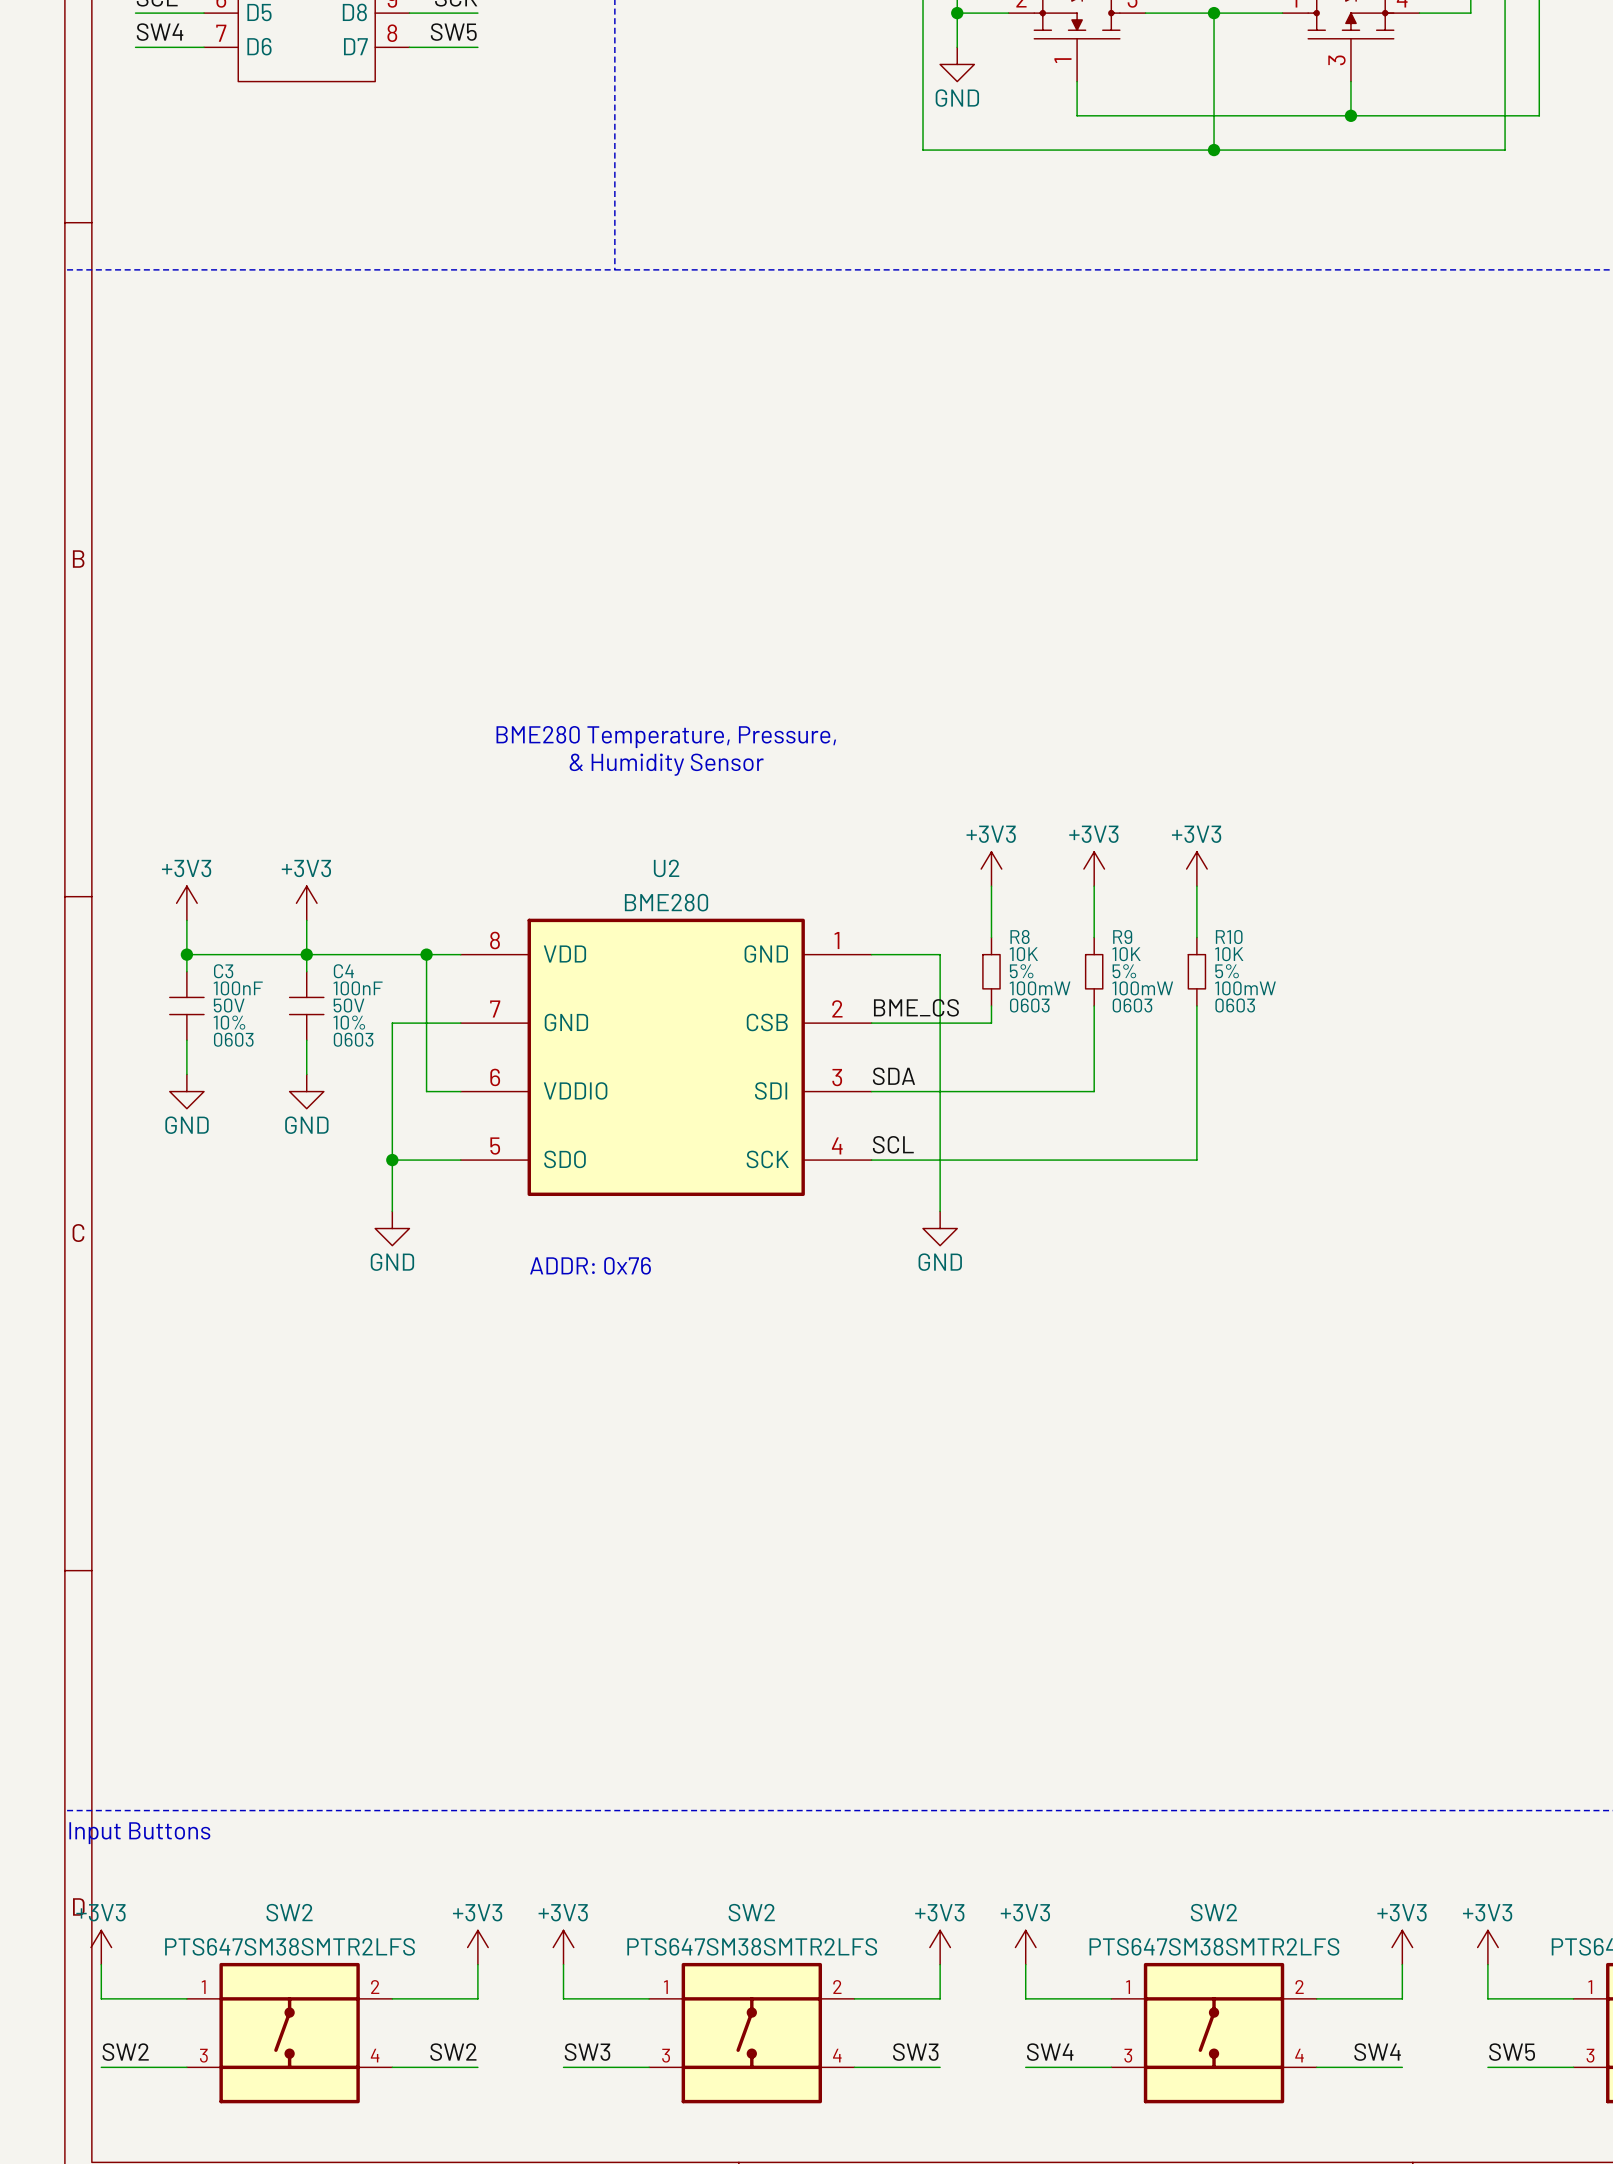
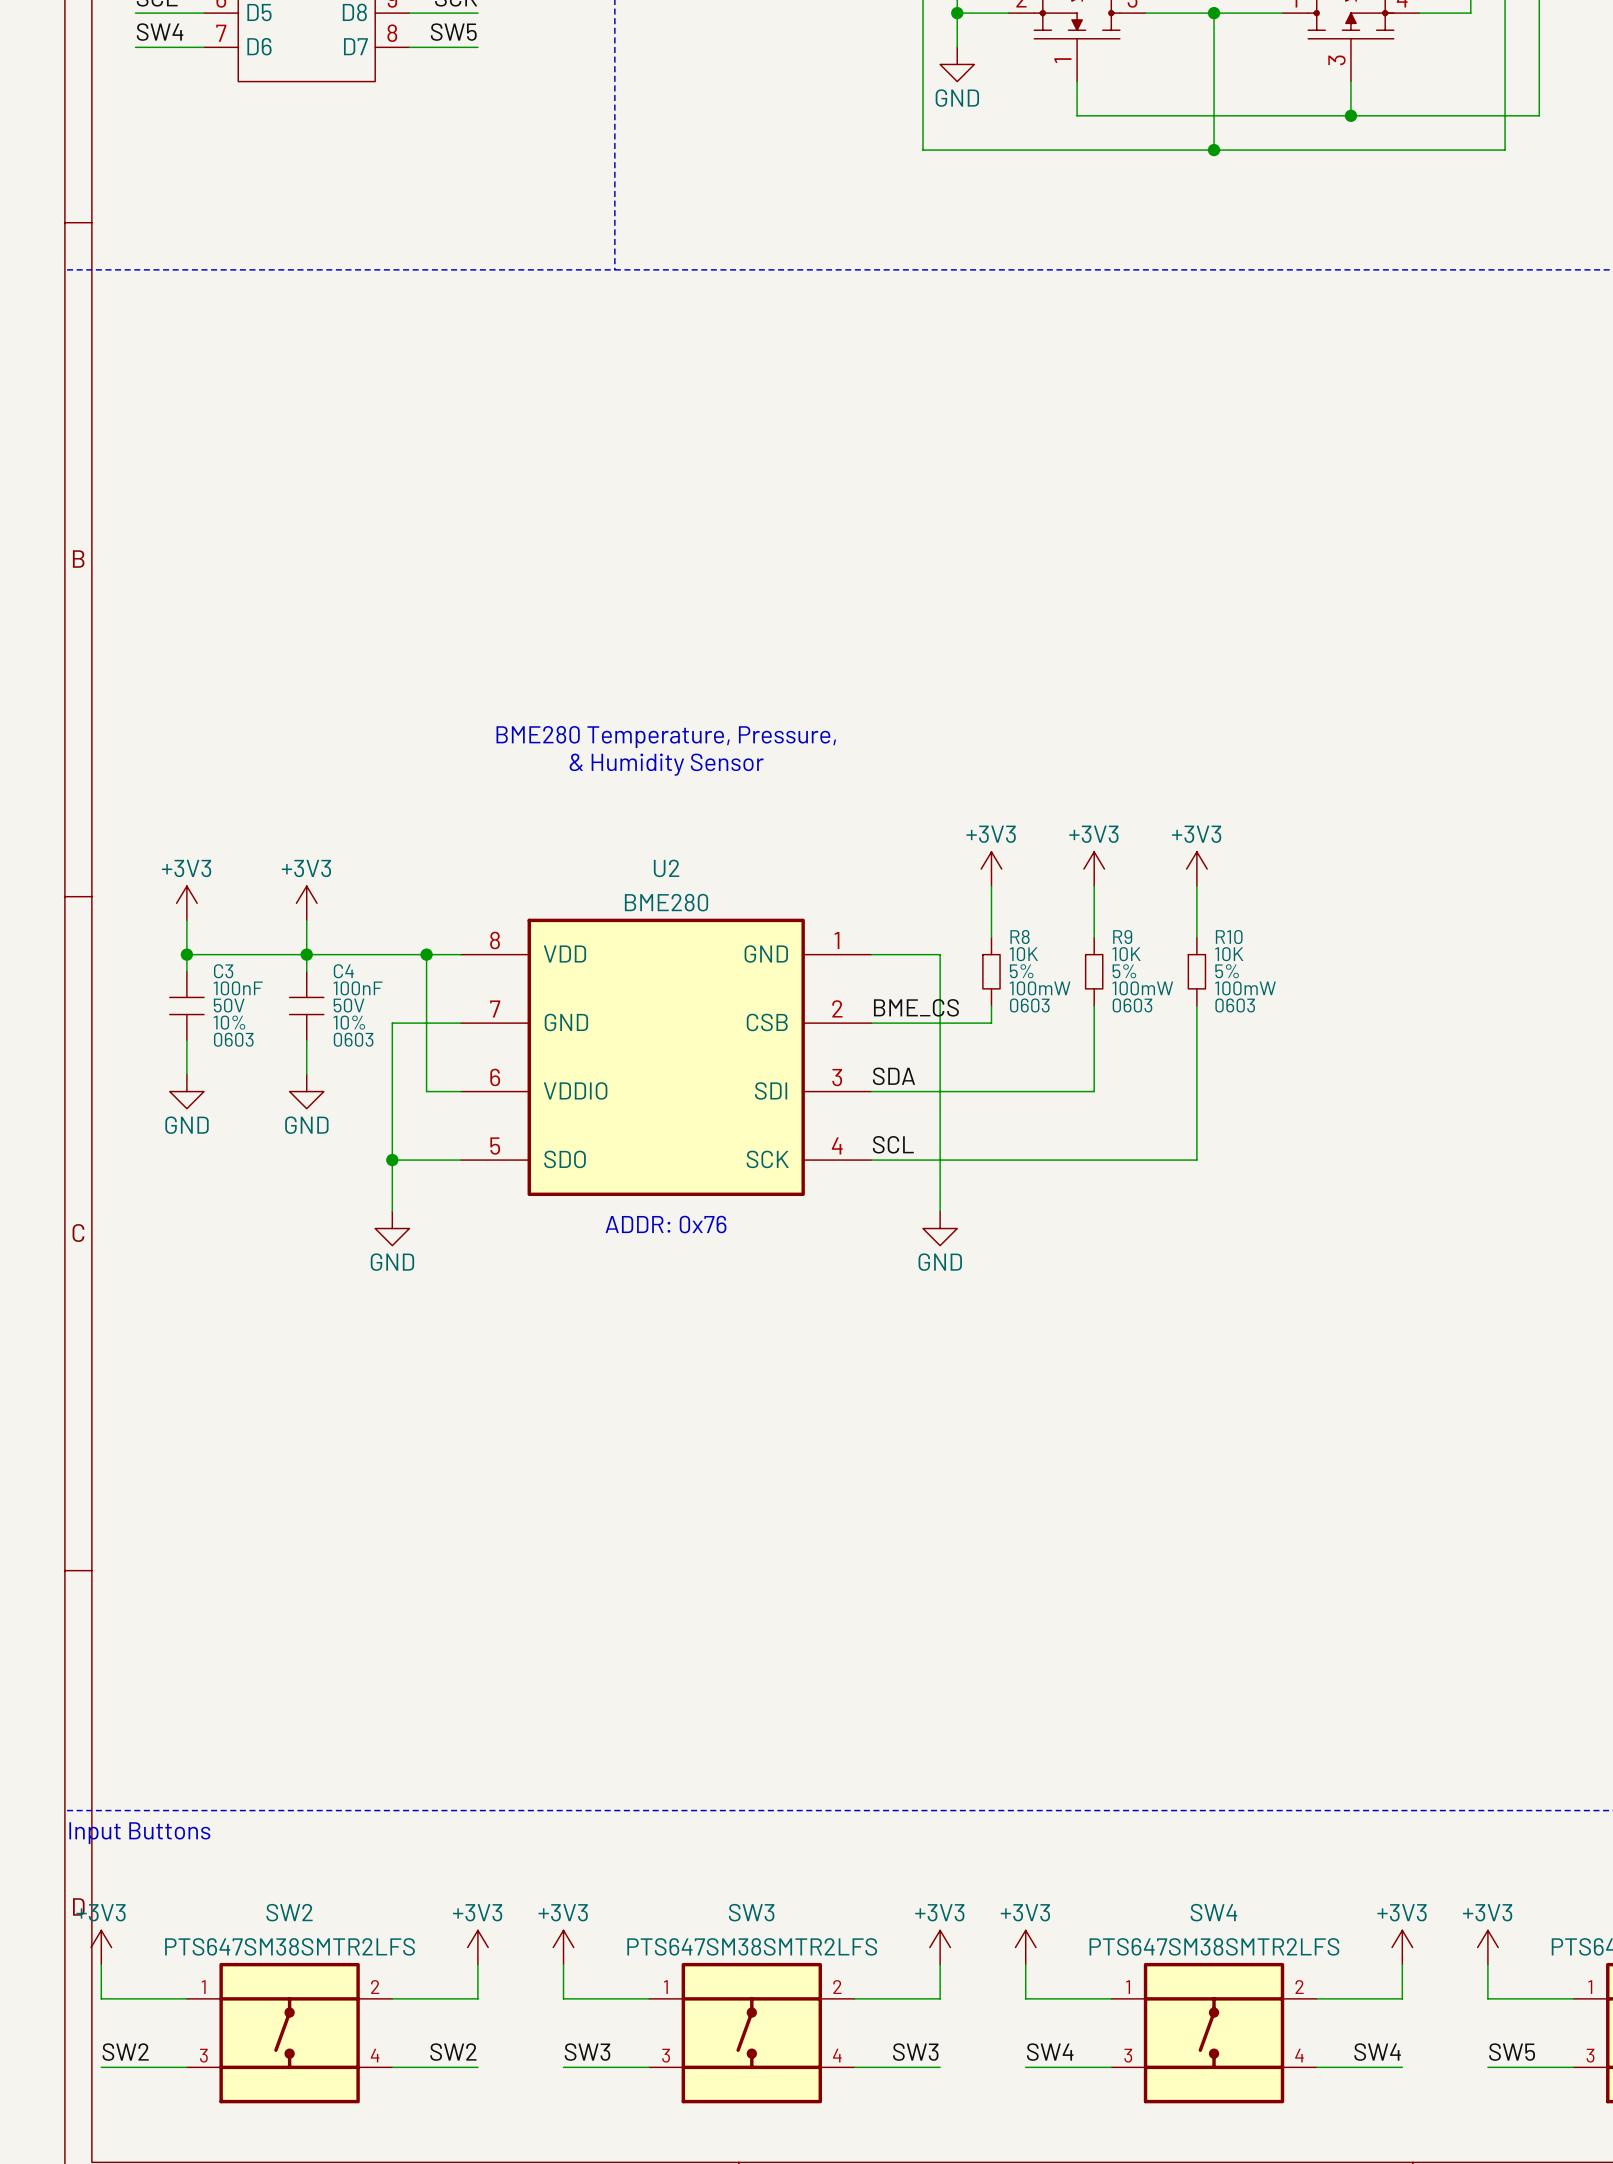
text position: ADDR: 0x76 (590, 1265) -> ADDR: 0x76 (666, 1224)
SW2 name: SW2 (751, 1912) -> SW3 (751, 1912)
SW2 name: SW2 (1213, 1912) -> SW4 (1213, 1912)

